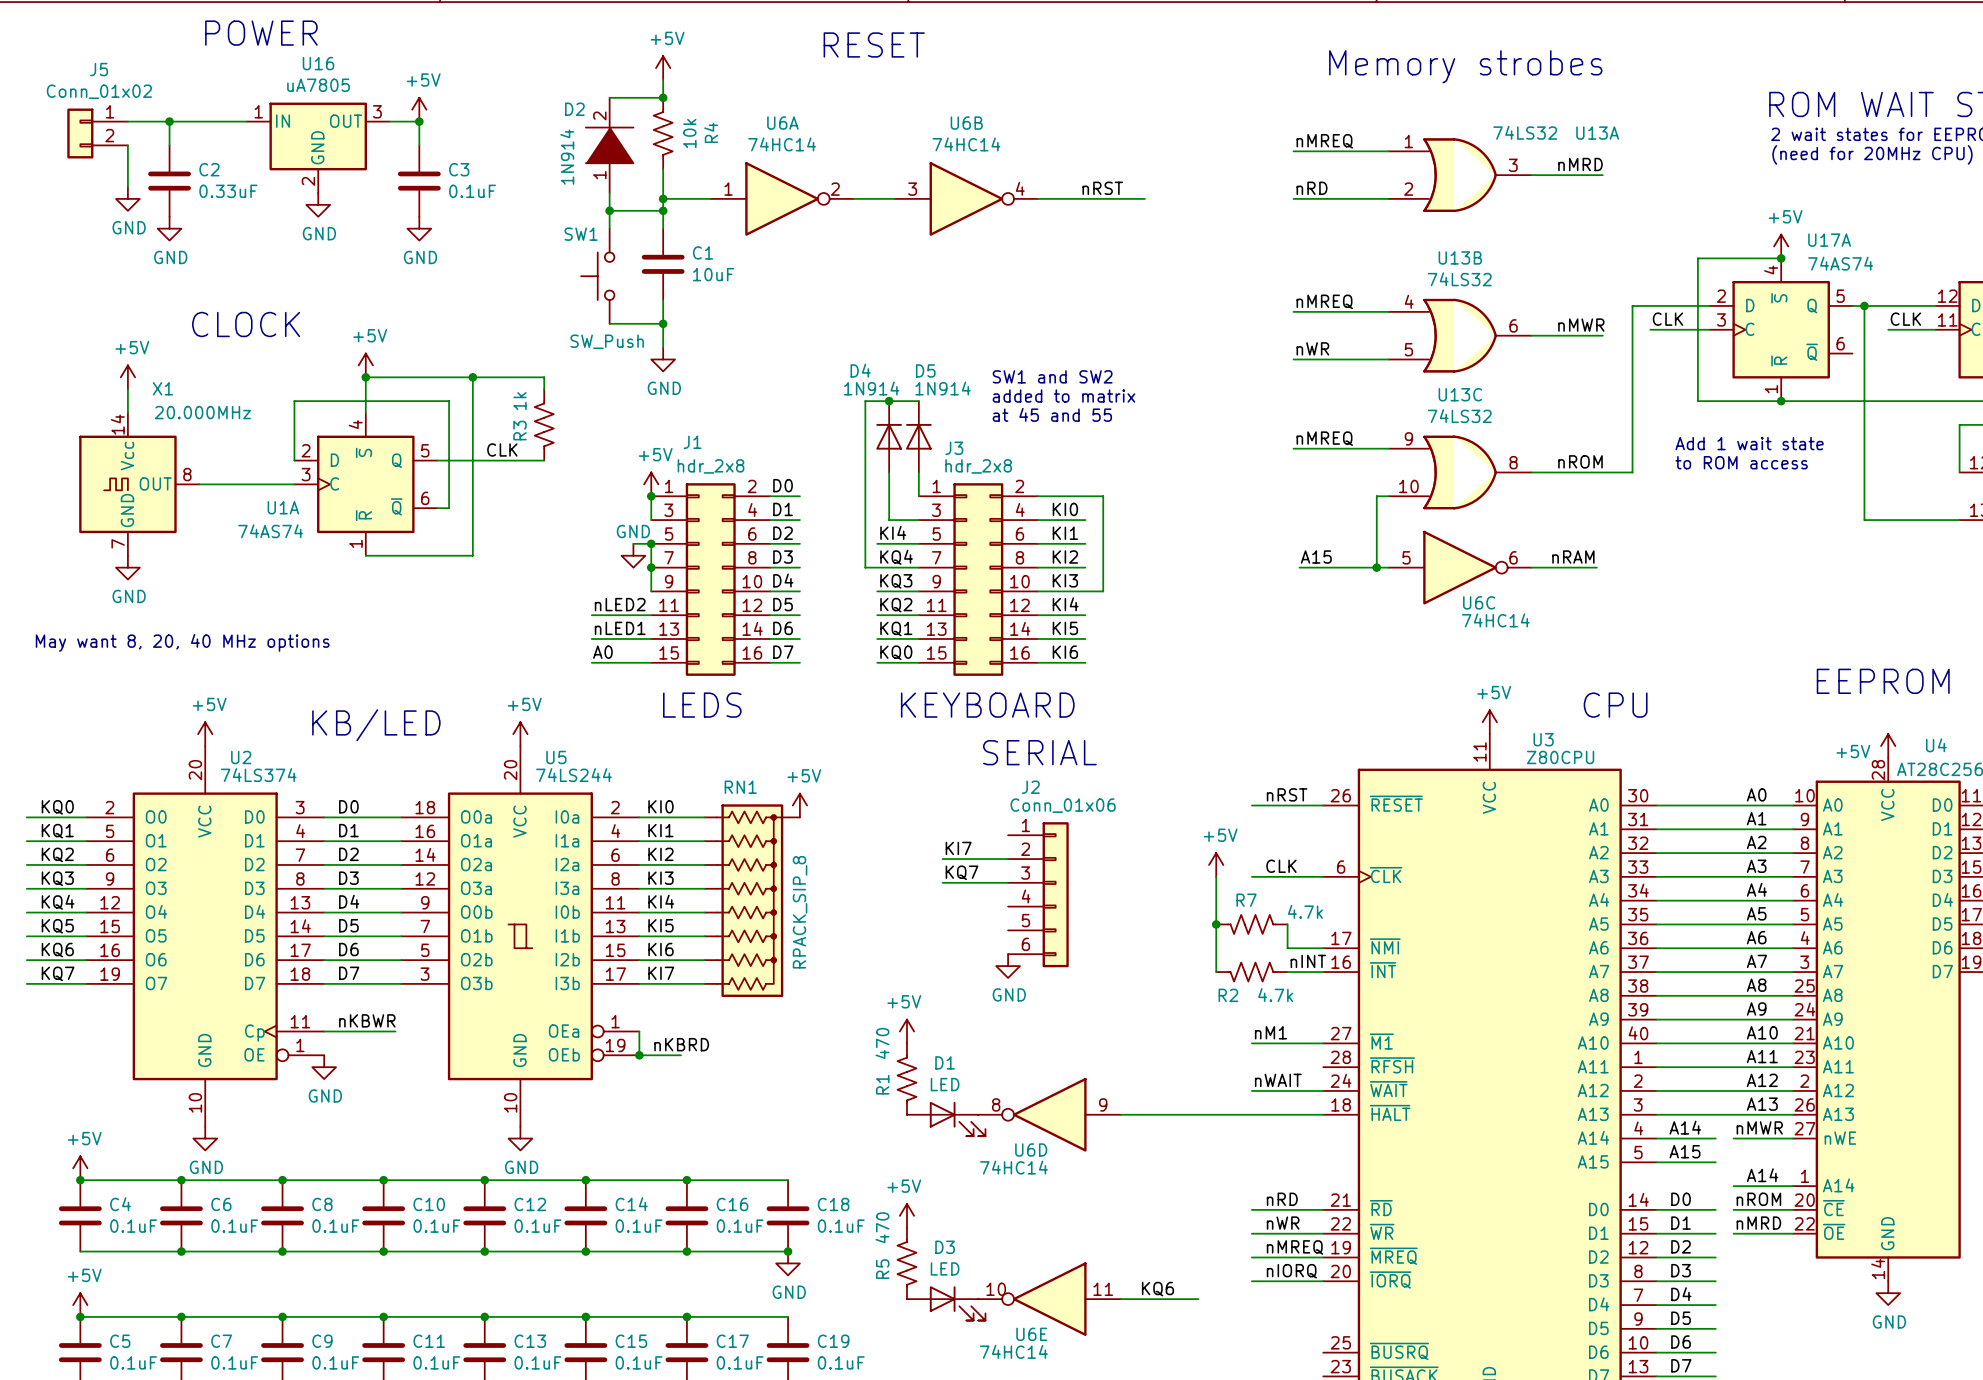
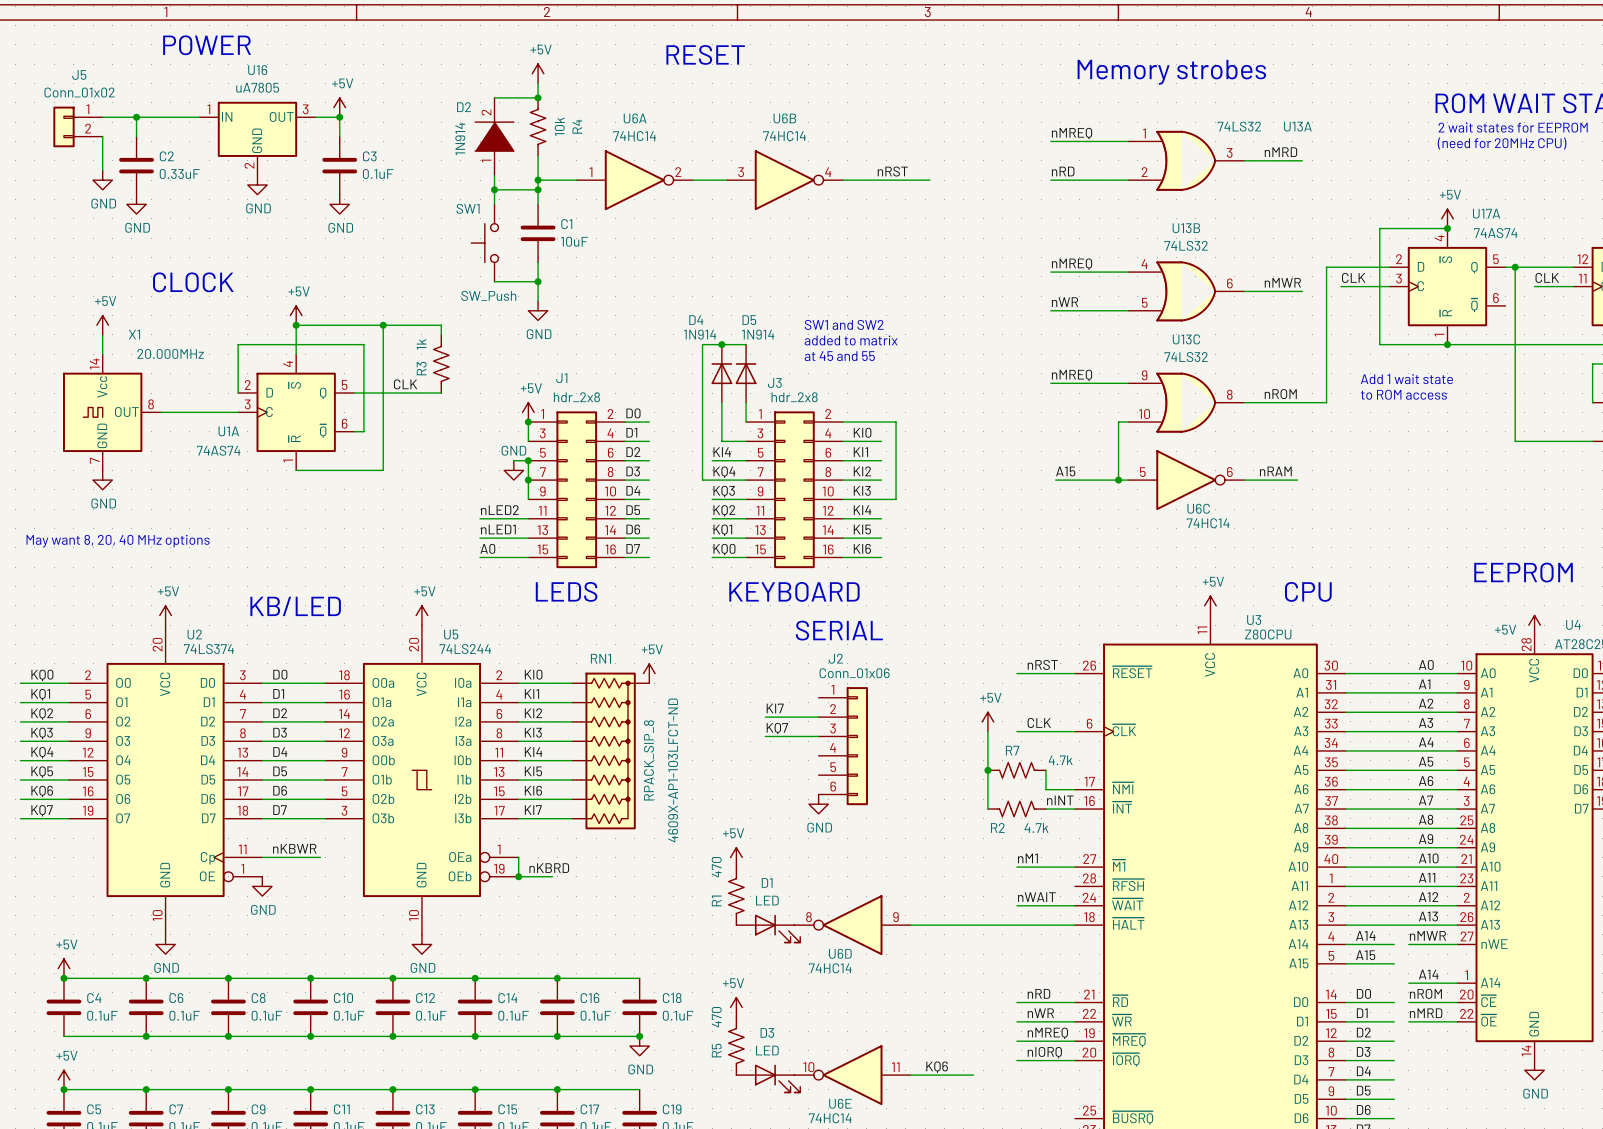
RN1 text: none -> 4609X-AP1-103LFCT-ND (673, 770)

